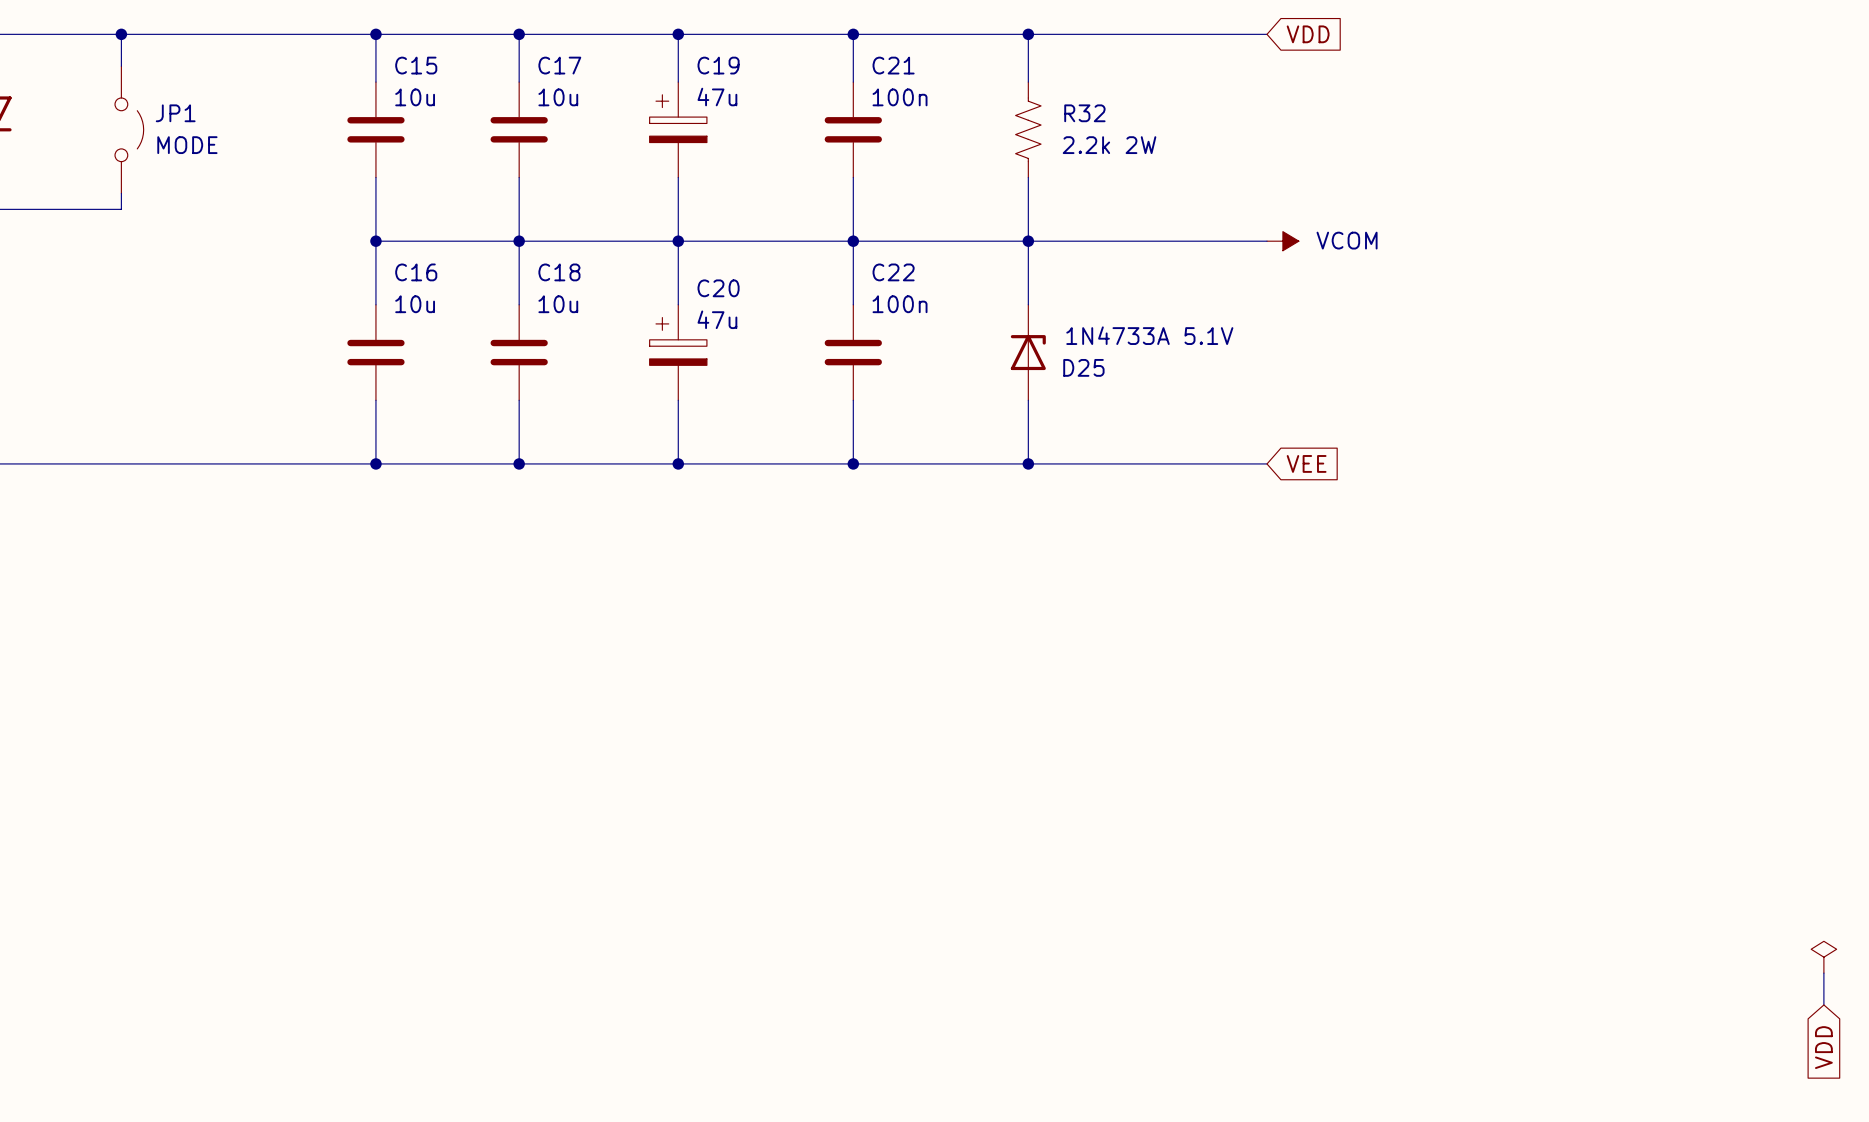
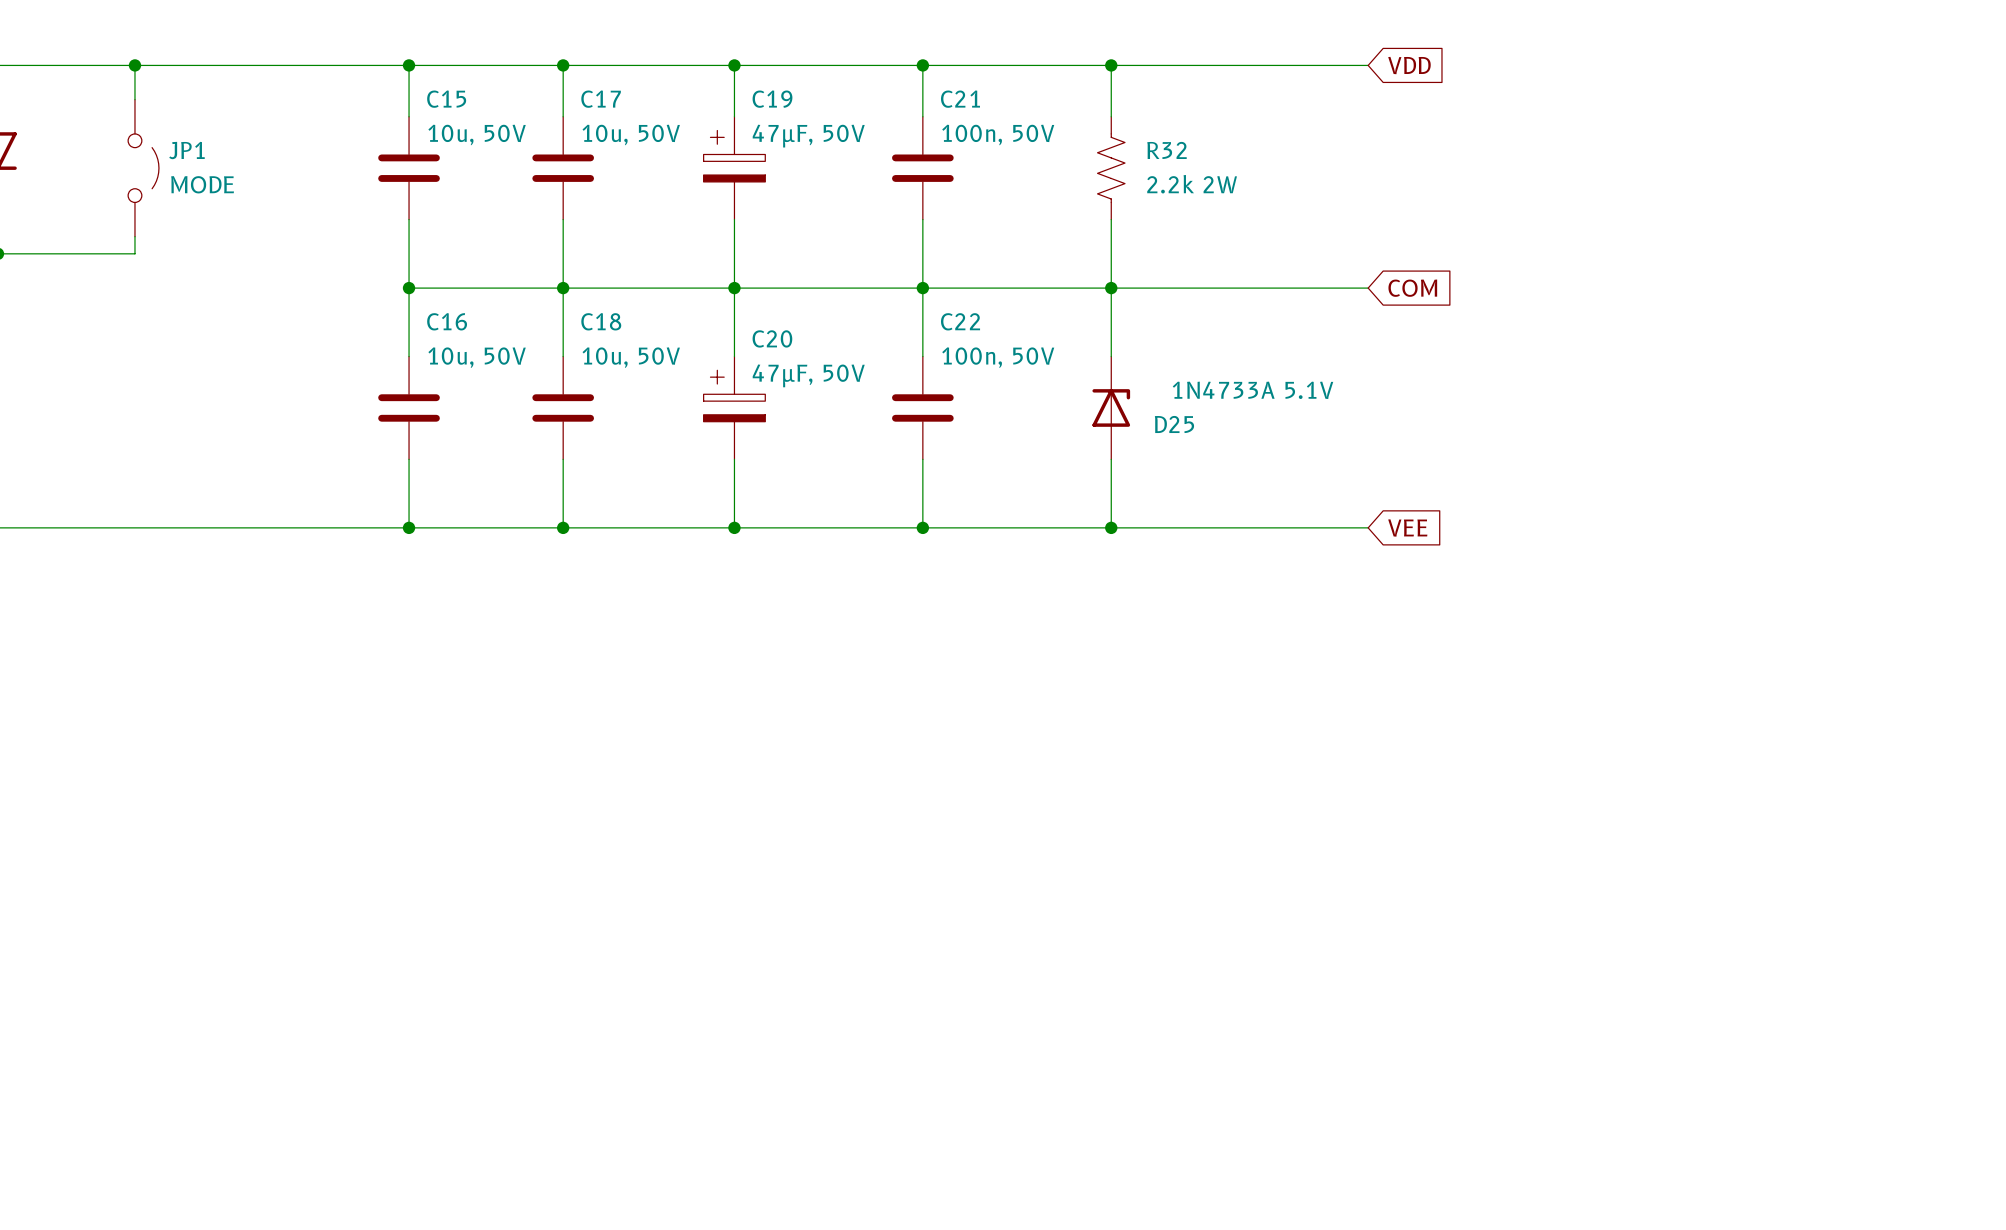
C15 value: 10u (415, 97) -> 10u, 50V (477, 134)
C17 value: 10u (558, 97) -> 10u, 50V (631, 134)
C19 value: 47u (717, 97) -> 47µF, 50V (808, 136)
C21 value: 100n (900, 97) -> 100n, 50V (998, 134)
power symbol: VCOM (1282, 241) -> none
global label: none -> COM (1412, 288)
C16 value: 10u (415, 304) -> 10u, 50V (477, 357)
C18 value: 10u (558, 304) -> 10u, 50V (631, 357)
C22 value: 100n (900, 304) -> 100n, 50V (998, 357)
C20 value: 47u (717, 319) -> 47µF, 50V (808, 375)
power symbol: (1823, 957) -> none
wire: (1823, 973) (1823, 1004) -> none
global label: VDD (1823, 1047) -> none

